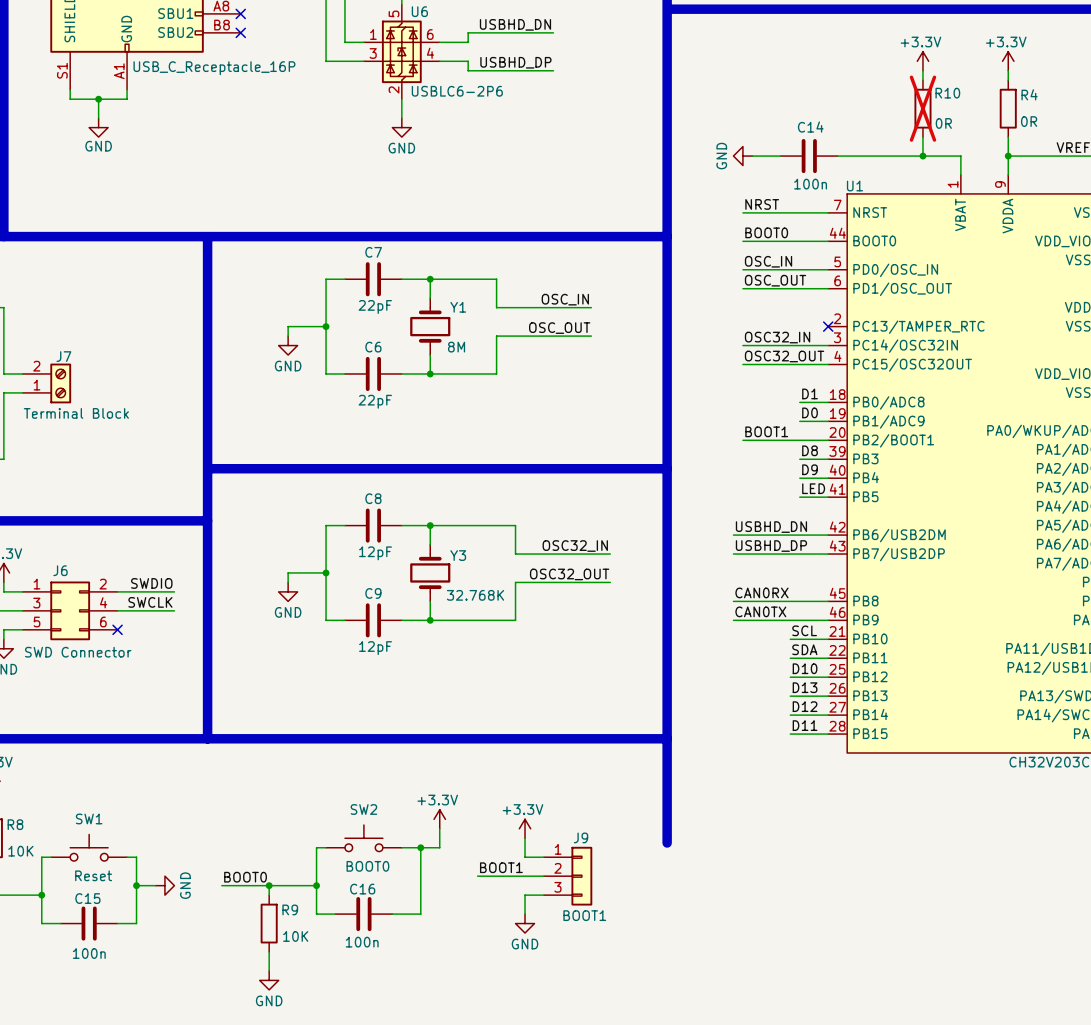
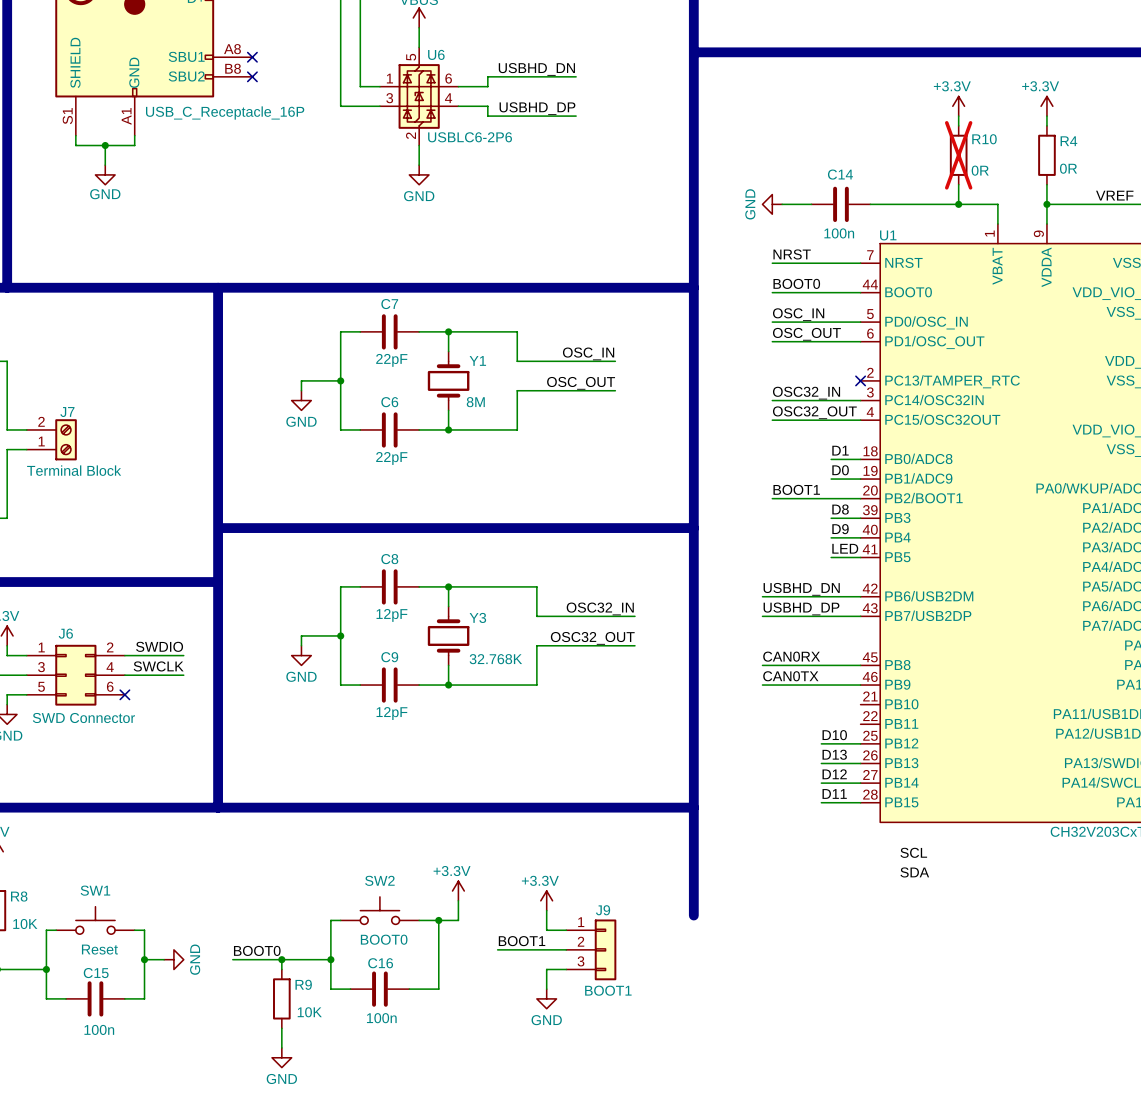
label position: SCL (804, 630) -> SCL (913, 852)
wire: (790, 639) (828, 639) -> none
label position: SDA (804, 649) -> SDA (914, 872)
wire: (790, 658) (828, 658) -> none

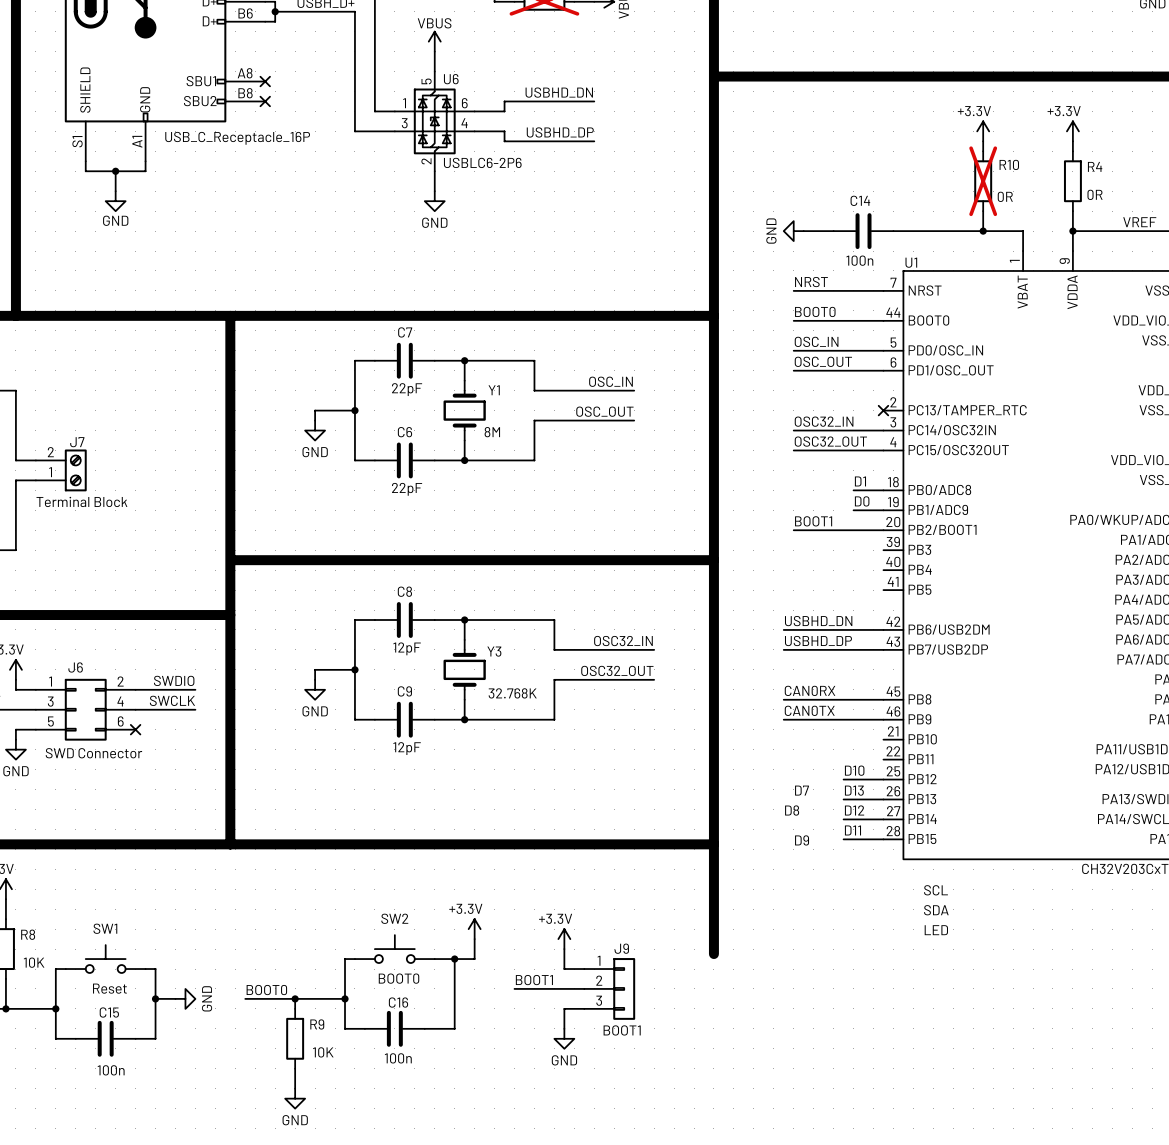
label: D8 (840, 509) -> none
wire: (831, 518) (860, 518) -> none
label: D9 (840, 529) -> none
wire: (831, 537) (860, 537) -> none
label: LED (845, 548) -> none
wire: (831, 557) (860, 557) -> none
label: none -> D7 (802, 790)
label: none -> D8 (792, 810)
label: none -> D9 (802, 840)
label: none -> LED (936, 930)

